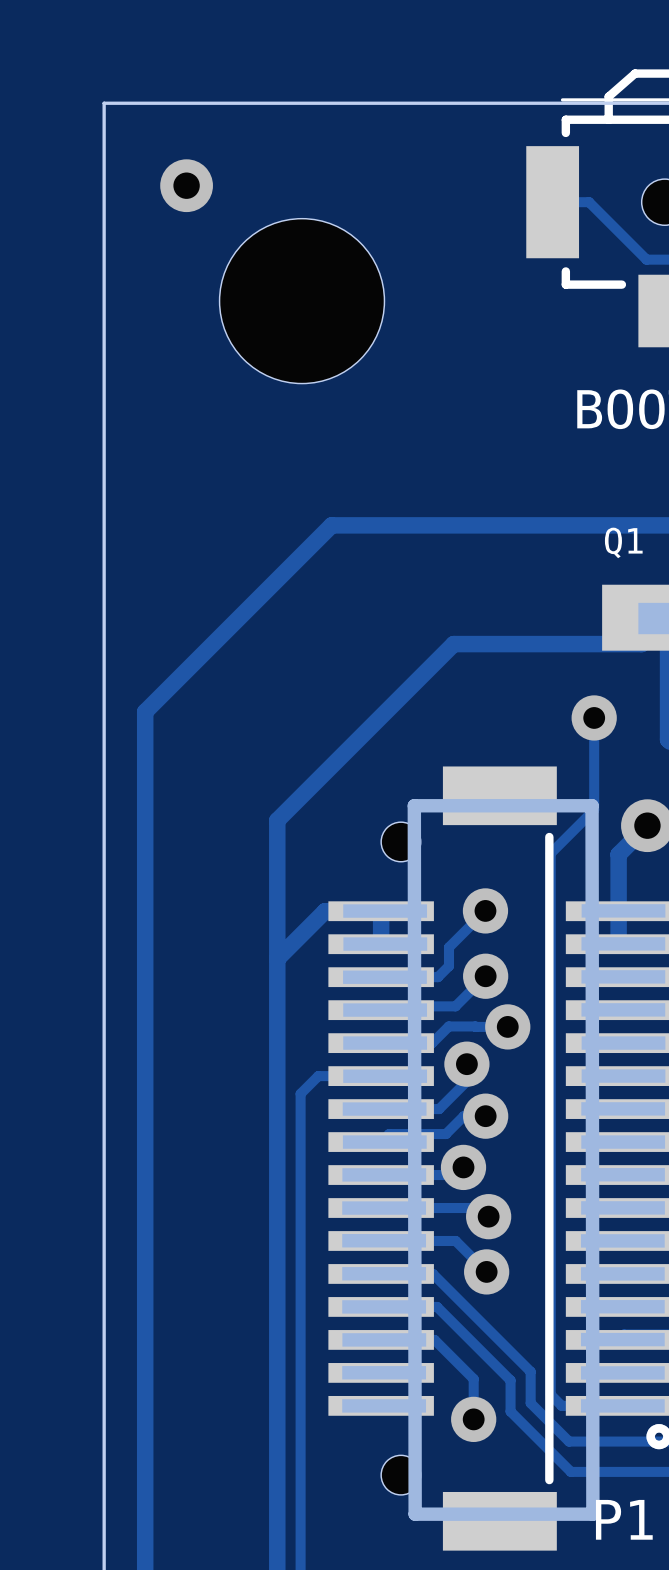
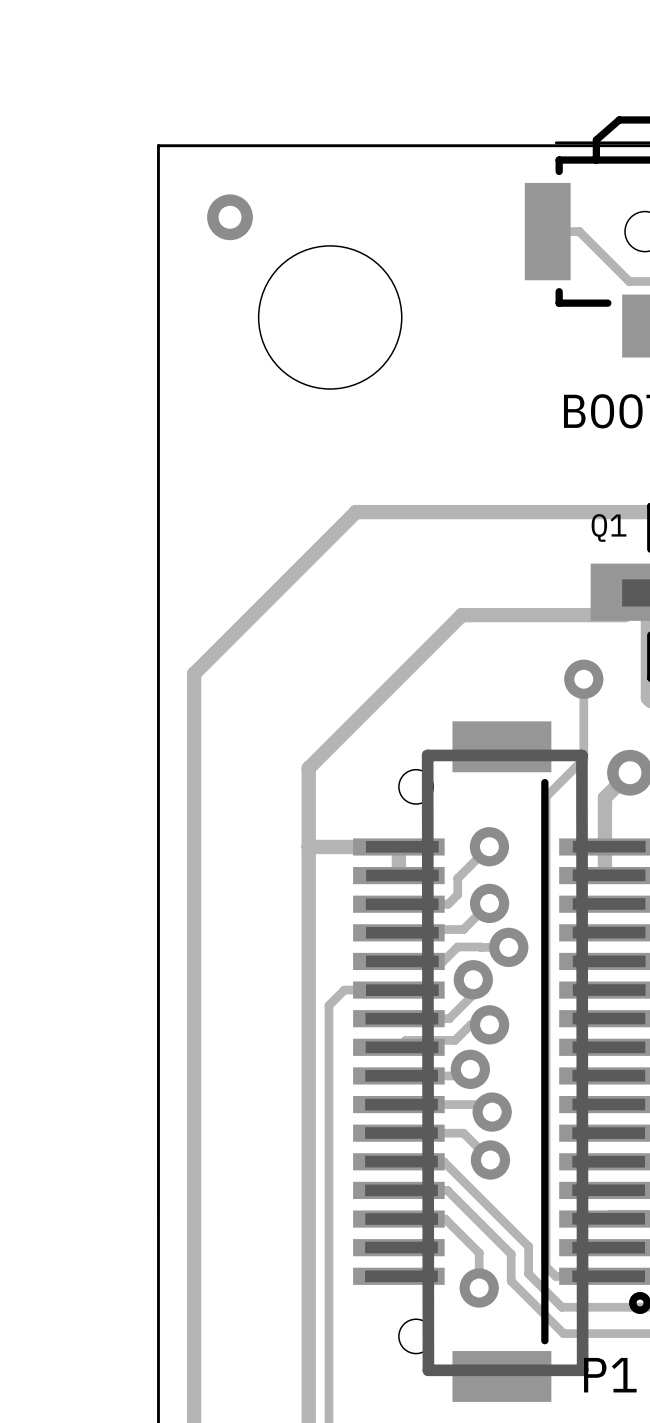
track: (325, 911) (277, 959) -> (350, 846) (308, 846)

